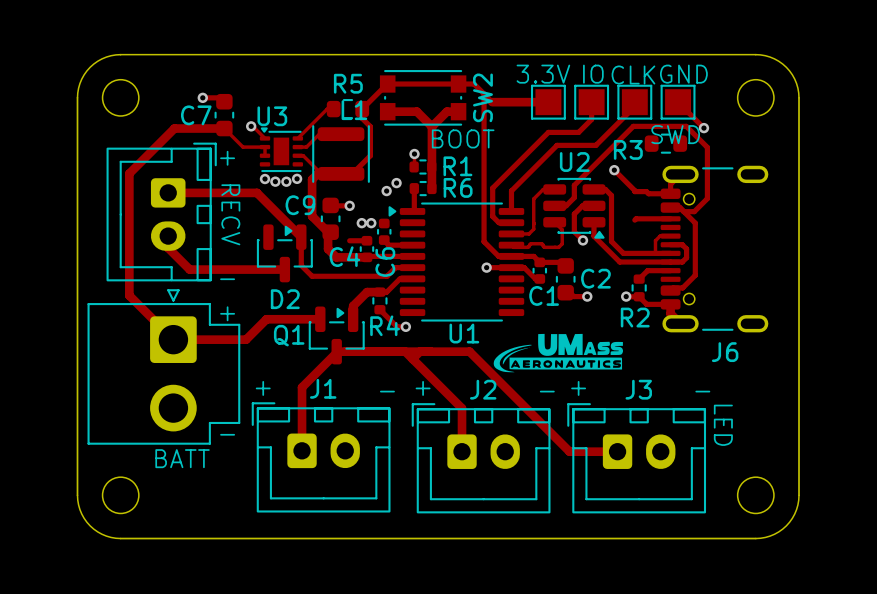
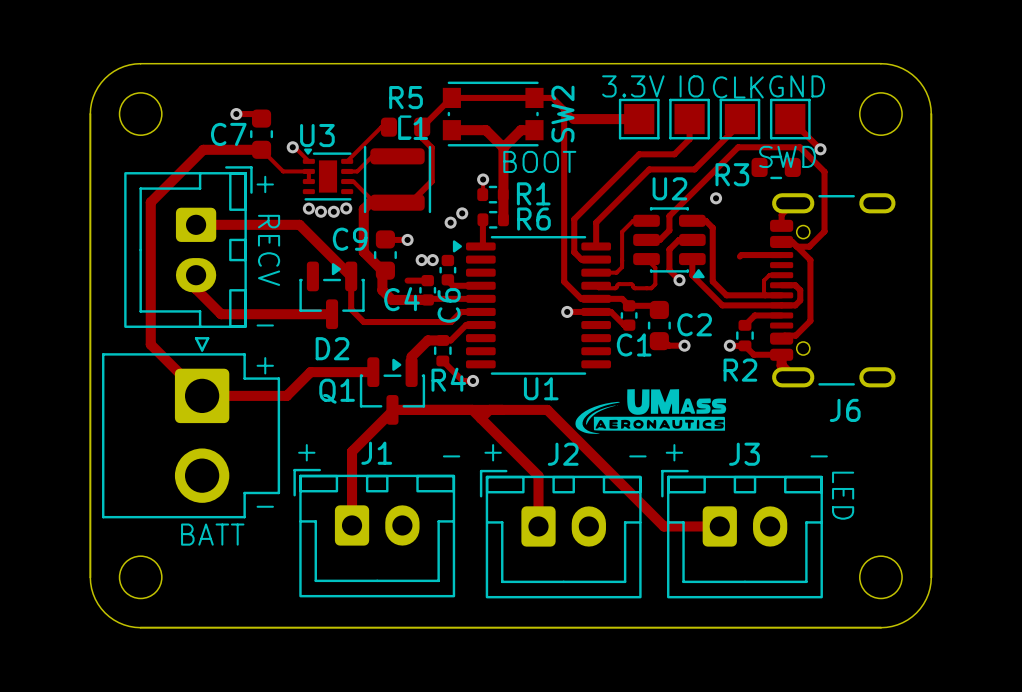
track: (614, 170) (634, 191) (670, 193) -> none

